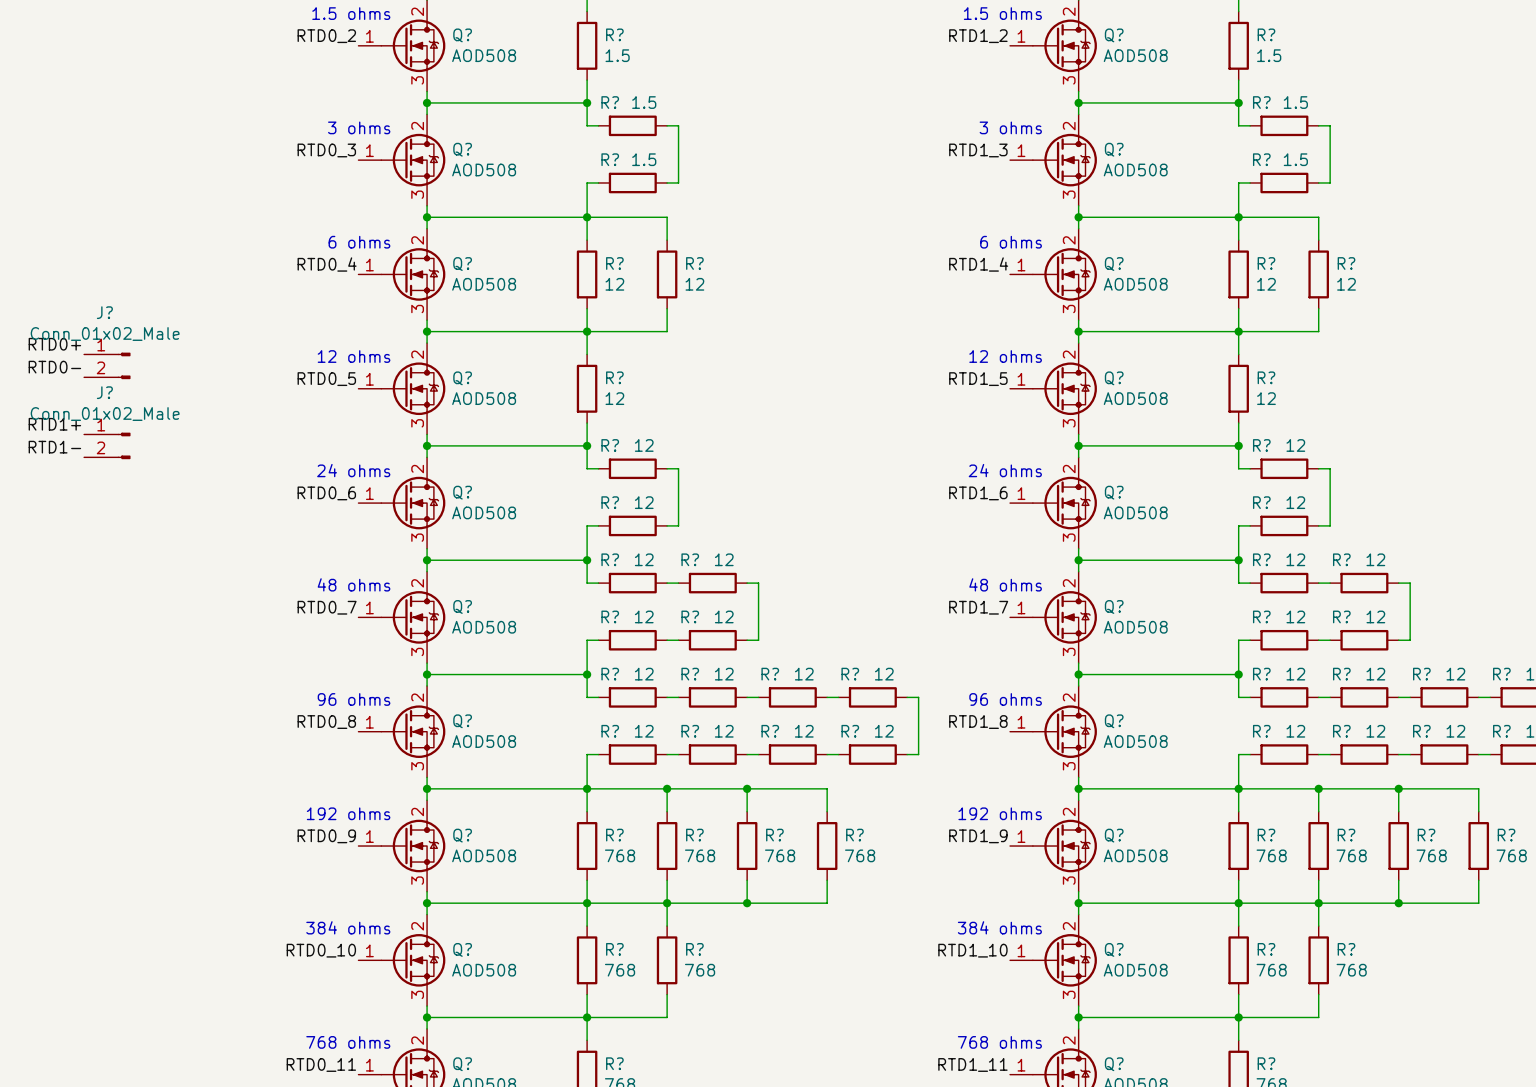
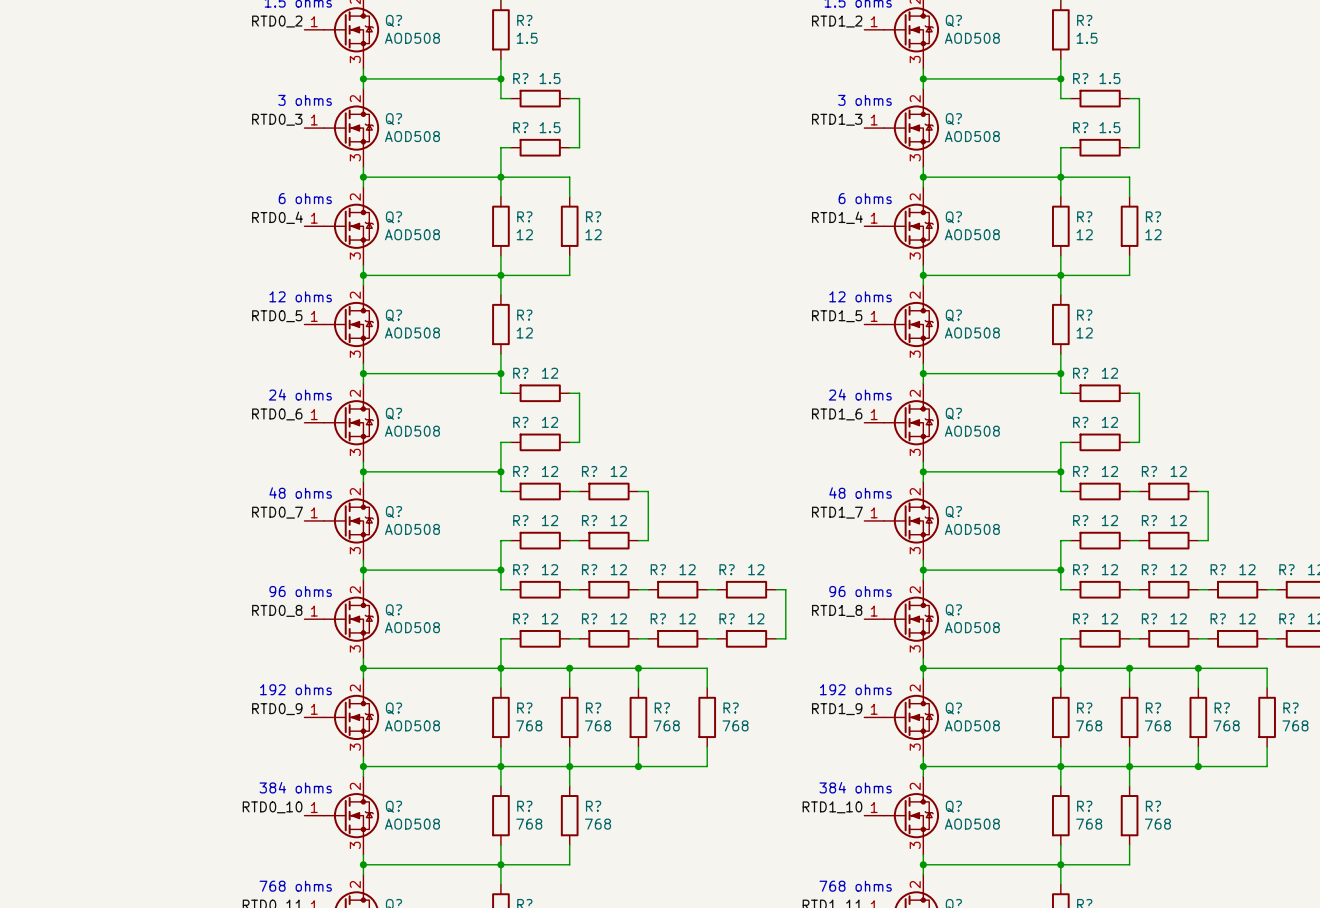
label: RTD0+ (54, 344) -> none
J?: Conn_01x02_Male (107, 365) -> none
label: RTD0- (54, 367) -> none
label: RTD1+ (54, 424) -> none
J?: Conn_01x02_Male (107, 445) -> none
label: RTD1- (54, 447) -> none

